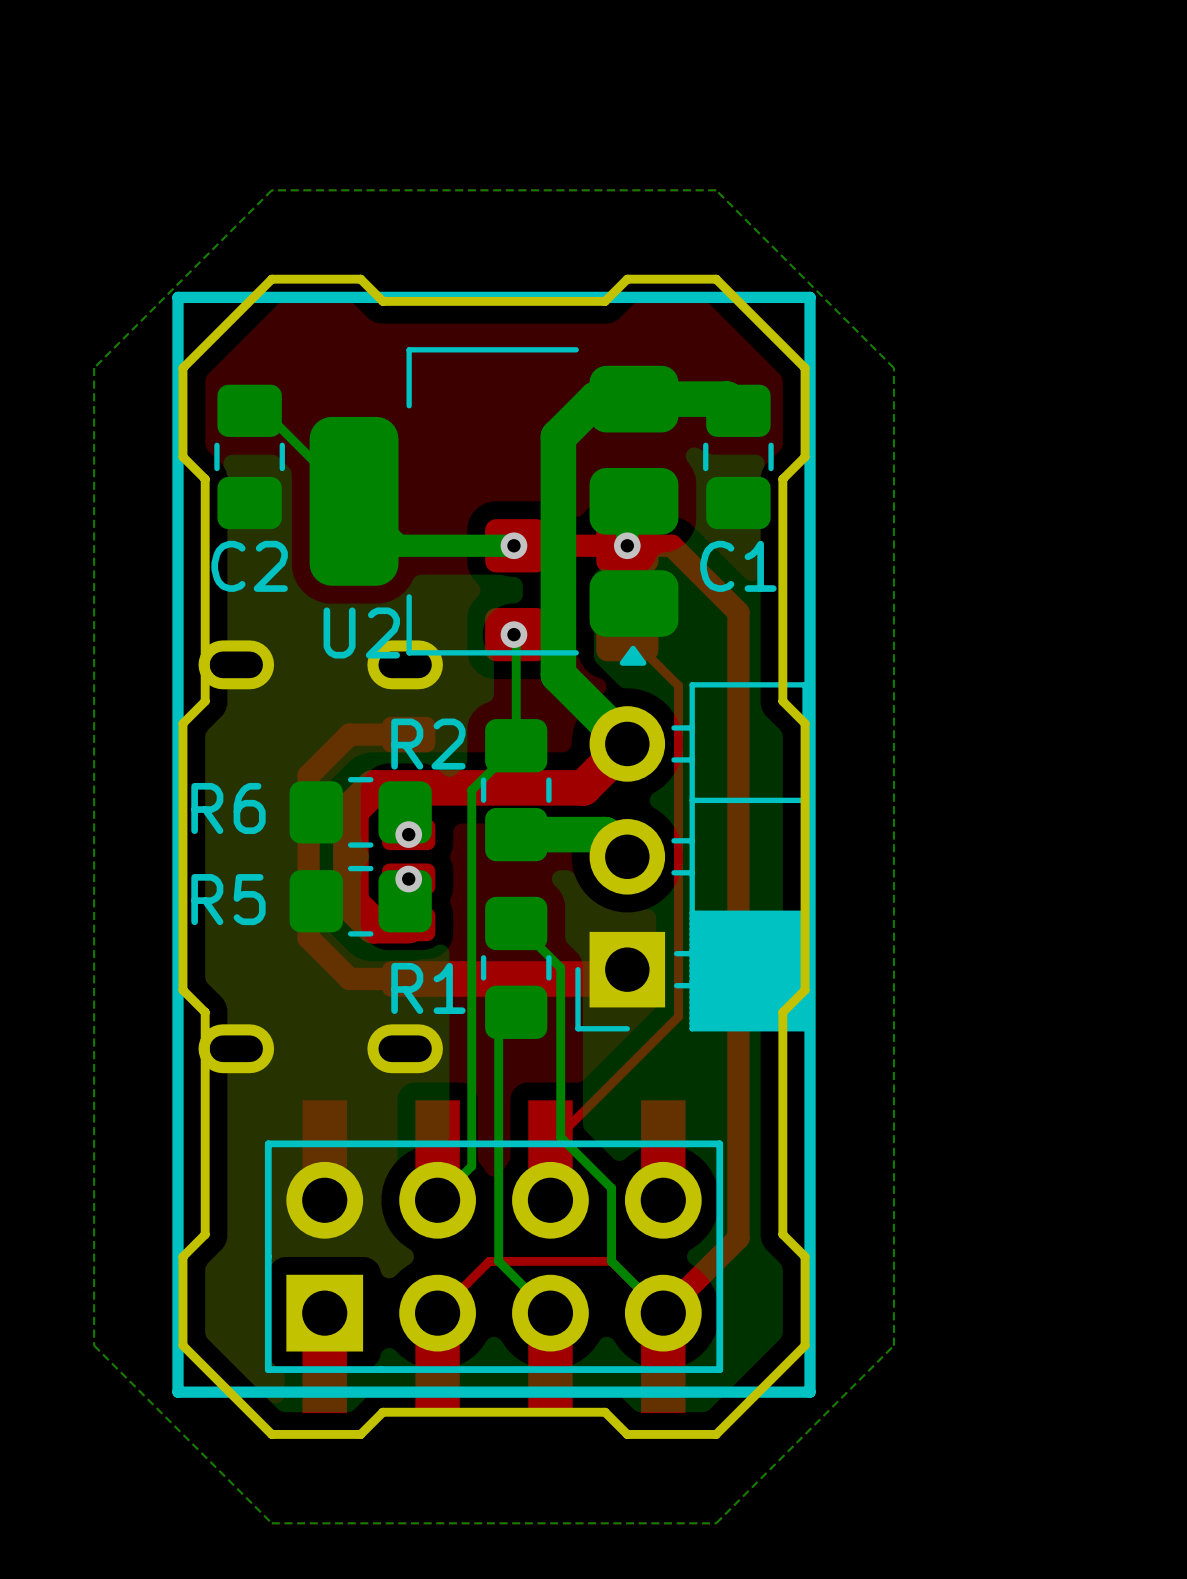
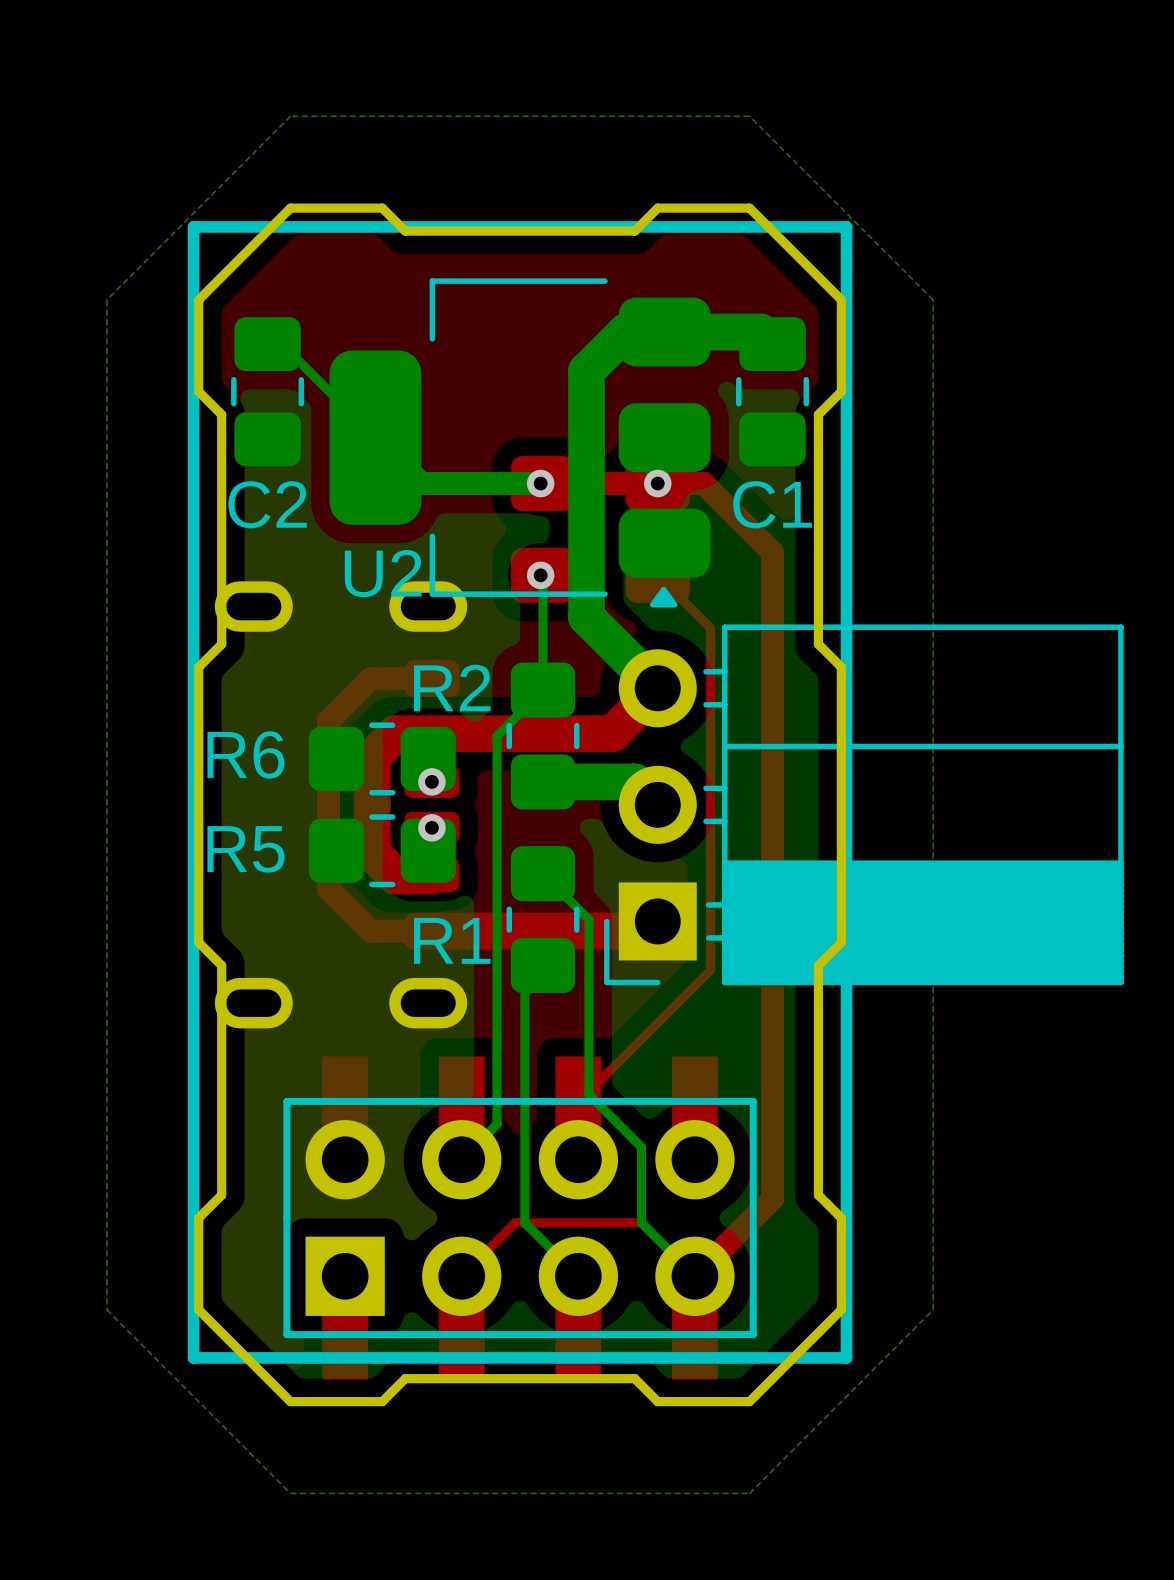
part: (691, 856) -> none
part: none -> (863, 804)

